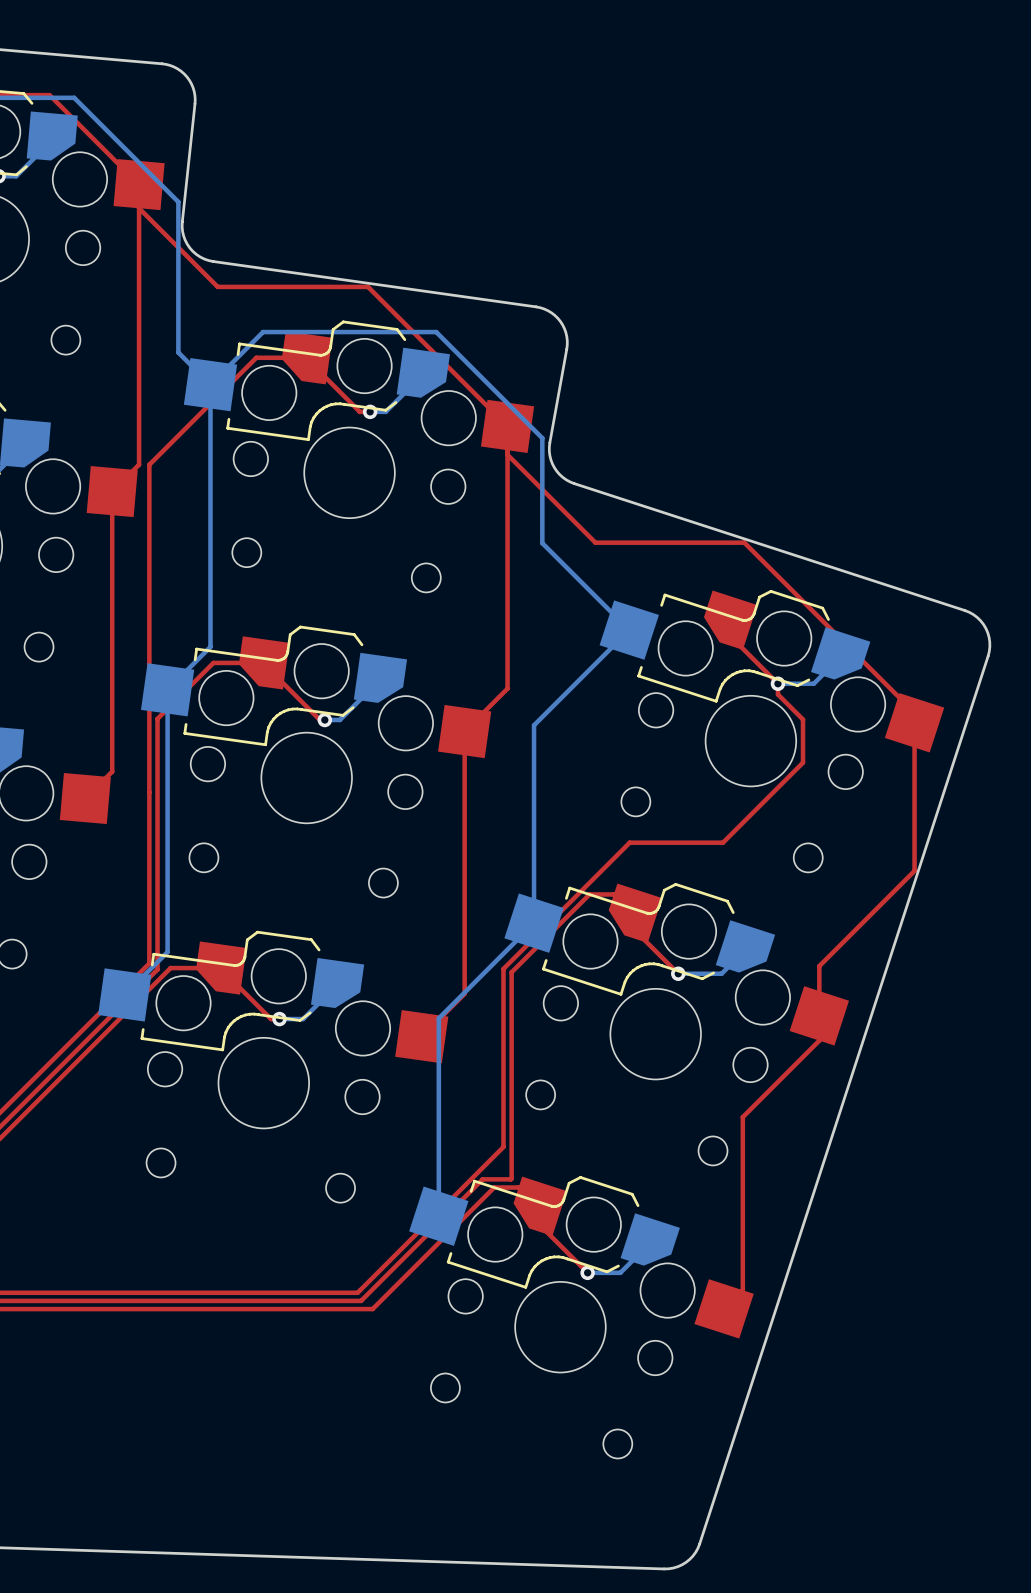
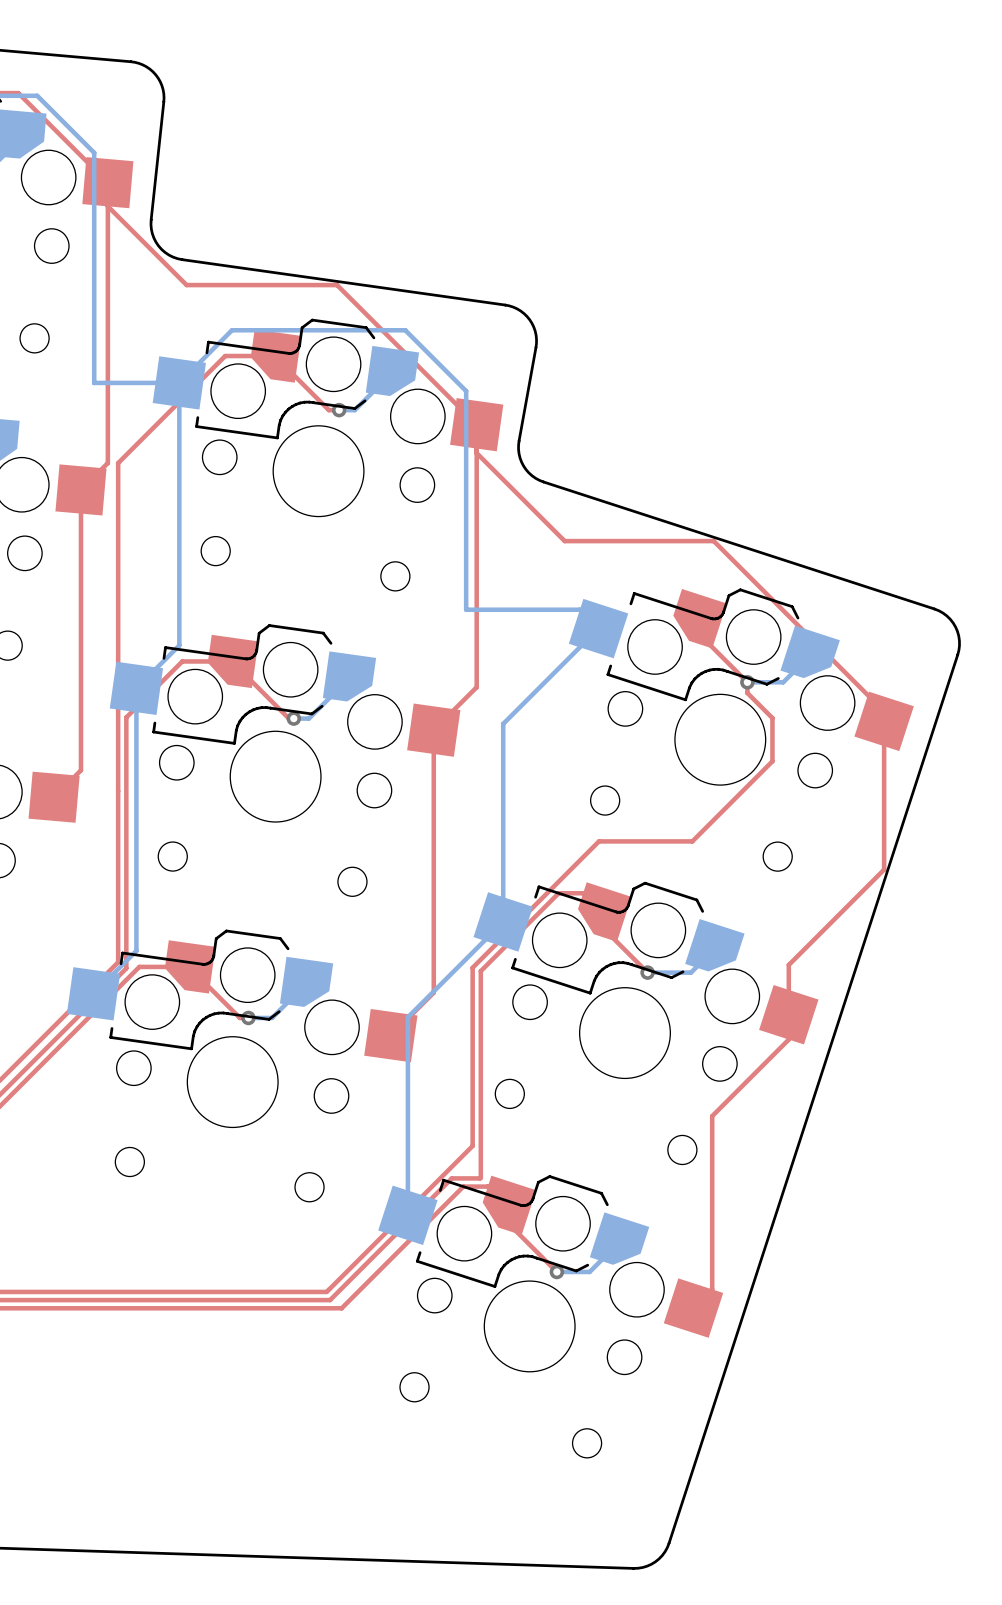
bottom track: (68, 97) (74, 97) (178, 201) (178, 352) (210, 384) -> (37, 95) (94, 152) (94, 382) (179, 382)
bottom track: (497, 392) (542, 438) (542, 543) (610, 611) -> (466, 391) (466, 609) (579, 609)

